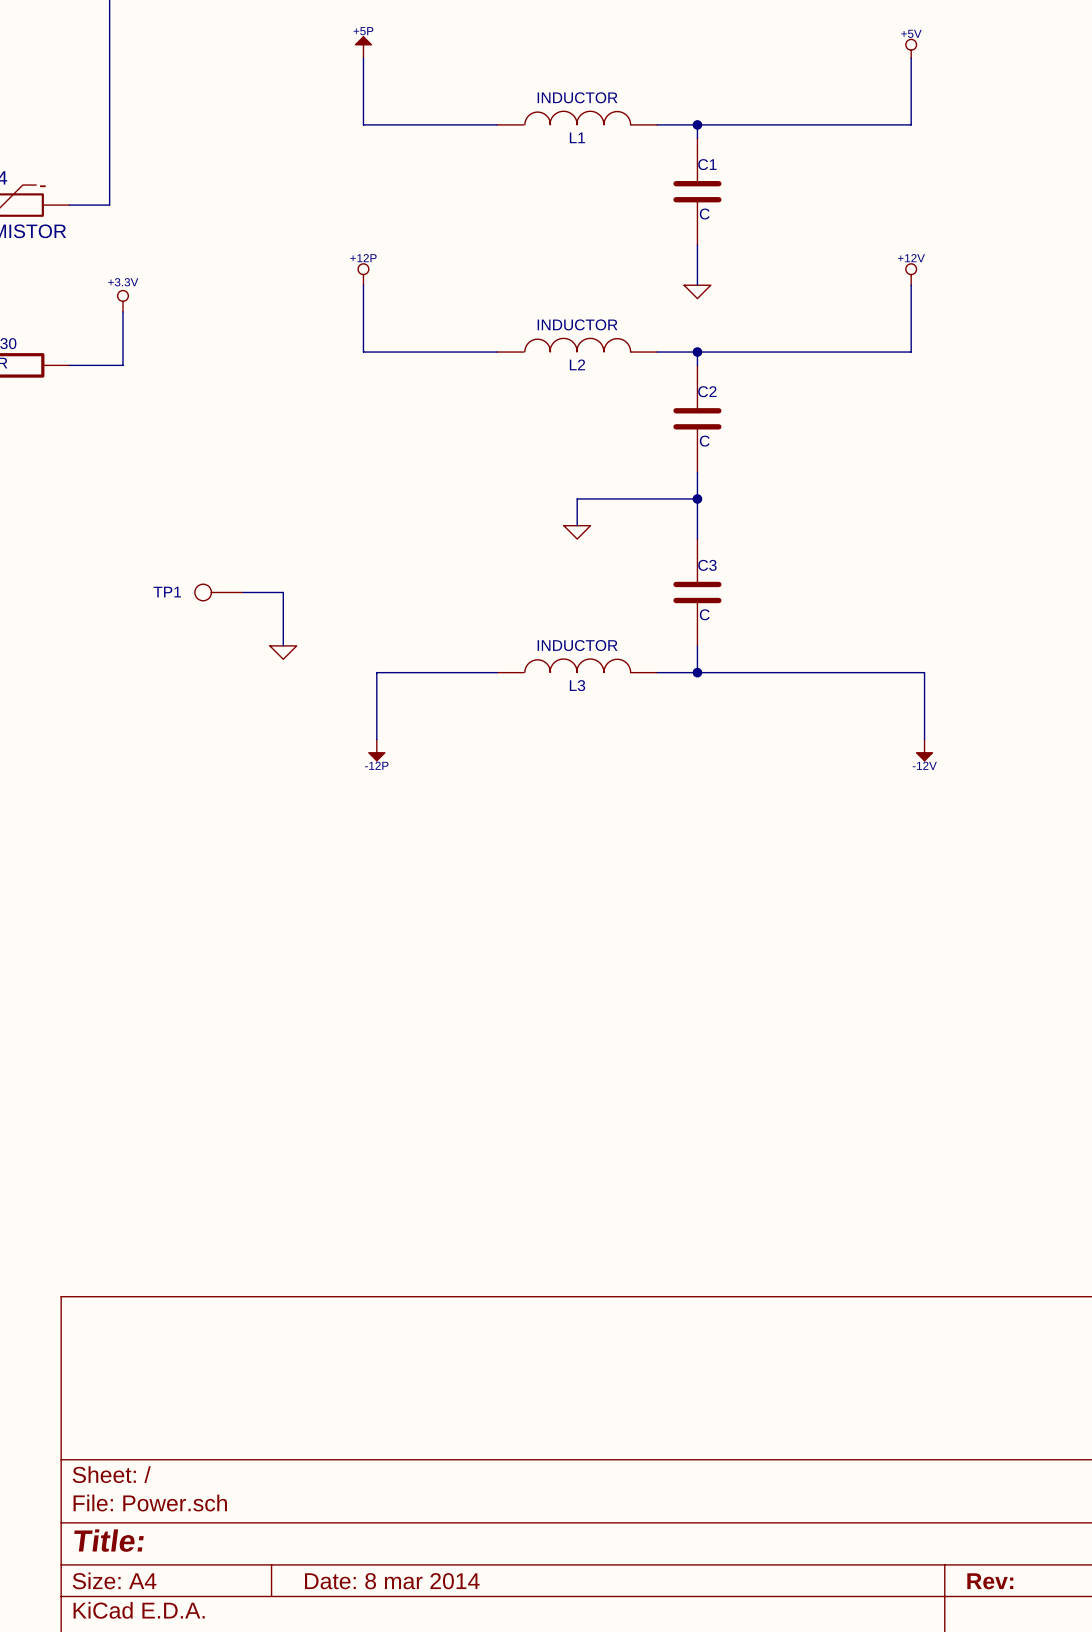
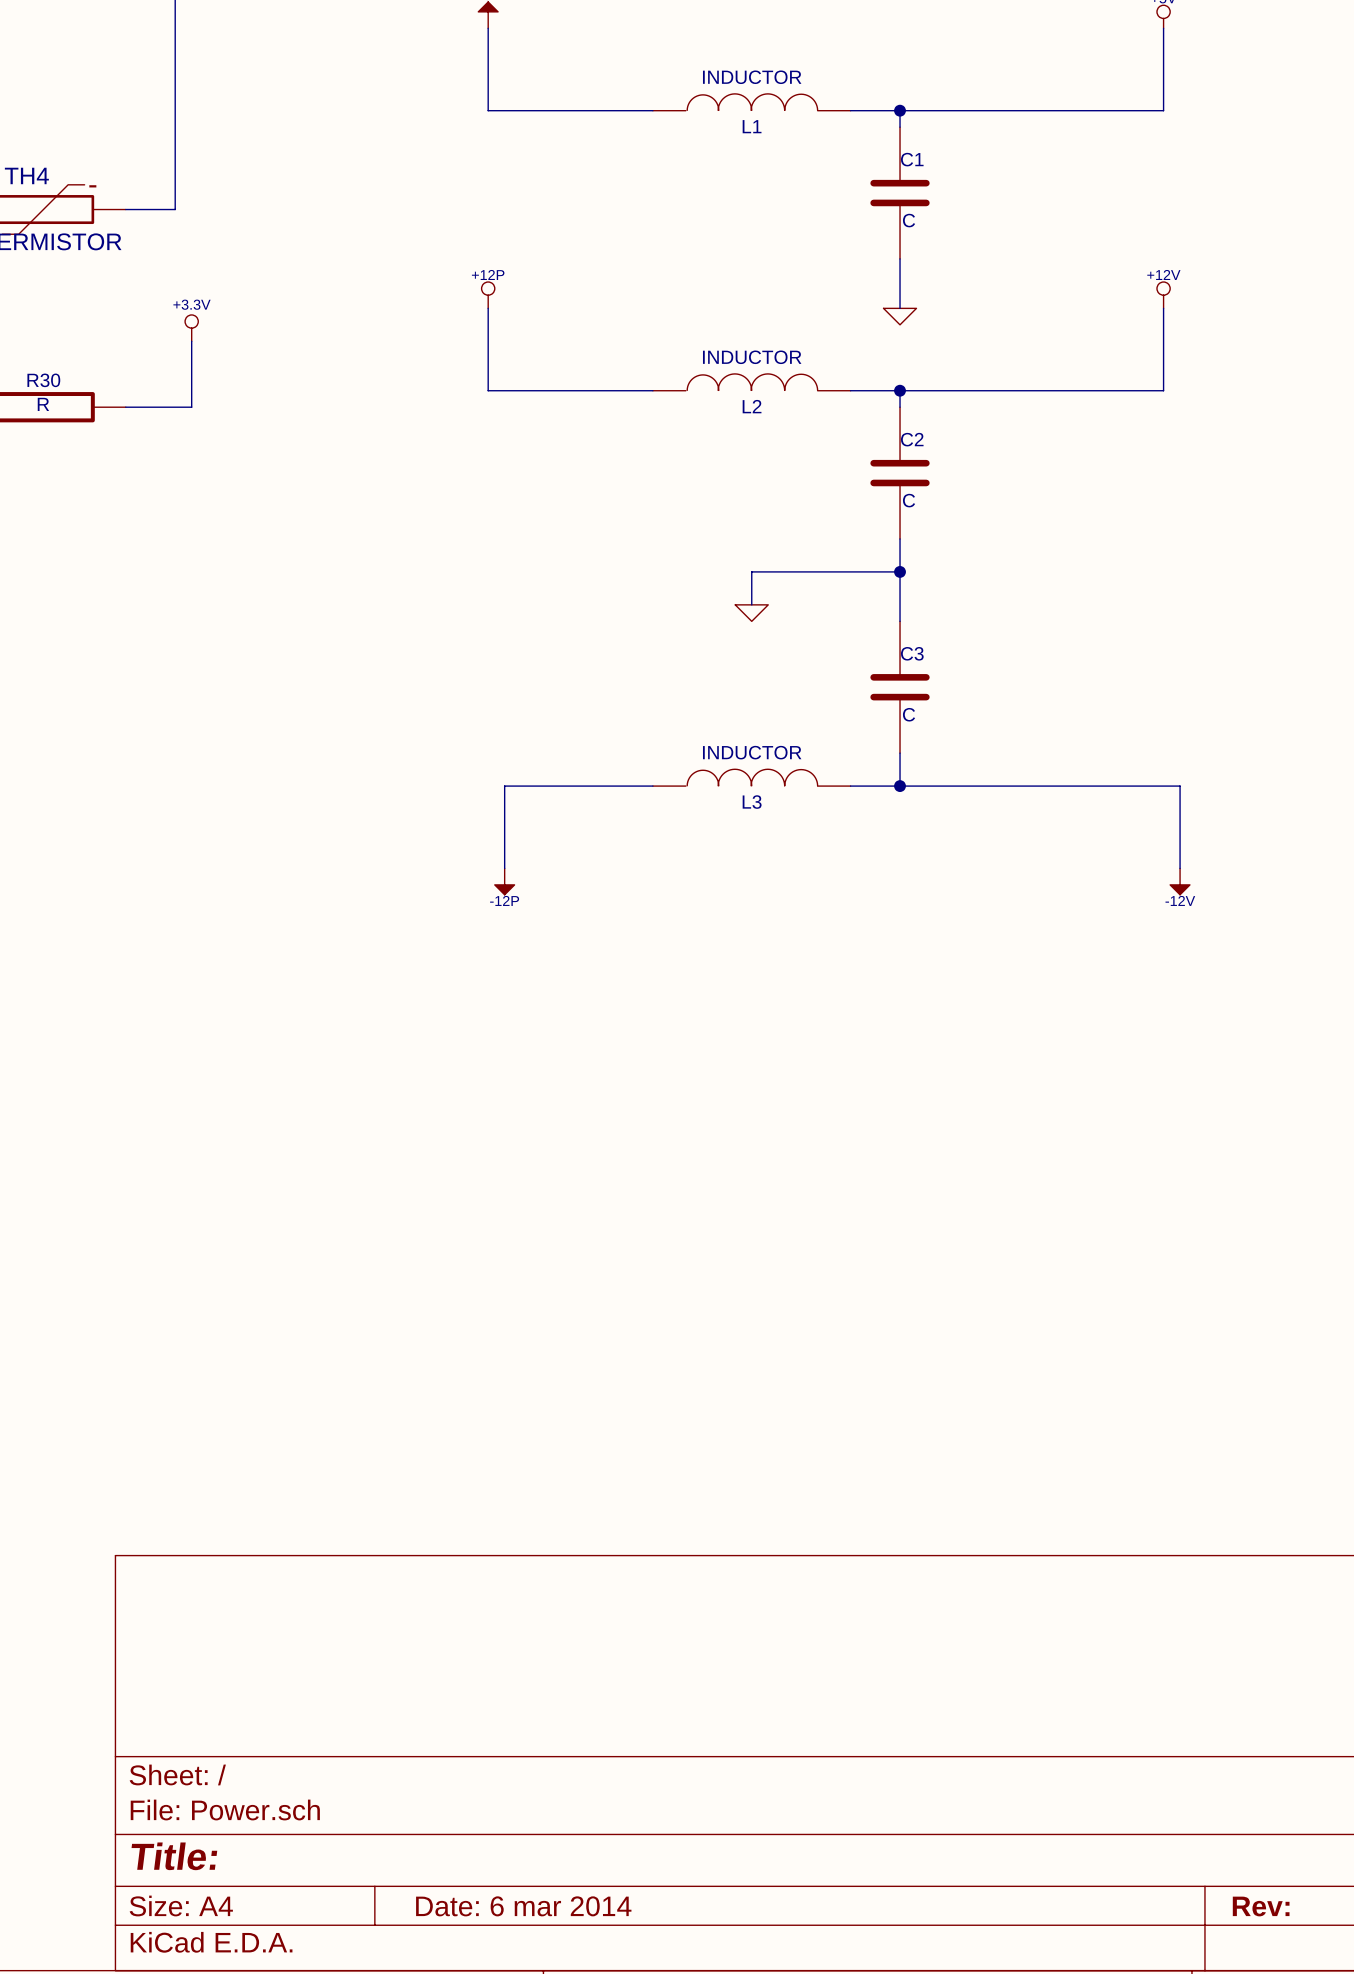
TP1: (219, 592) -> none
wire: (243, 592) (283, 592) (283, 645) -> none
power symbol: (283, 652) -> none
title block: Date: 8 mar 2014 (392, 1581) -> Date: 6 mar 2014 (523, 1906)

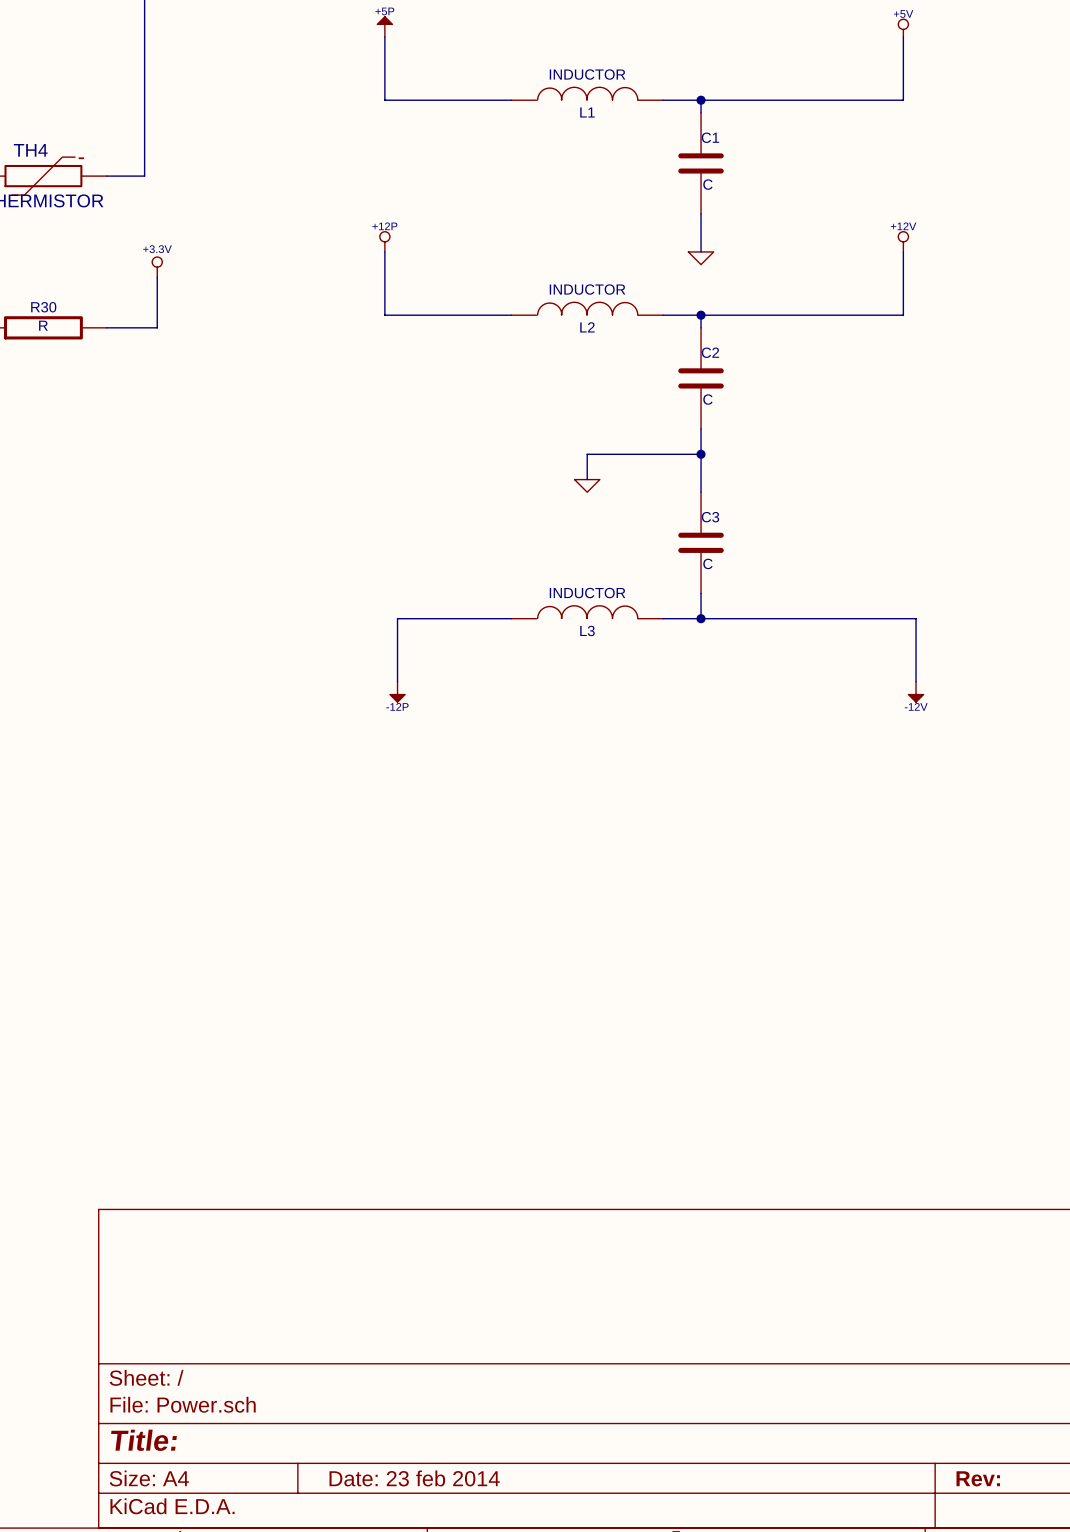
title block: Date: 6 mar 2014 (523, 1906) -> Date: 23 feb 2014 (414, 1478)

